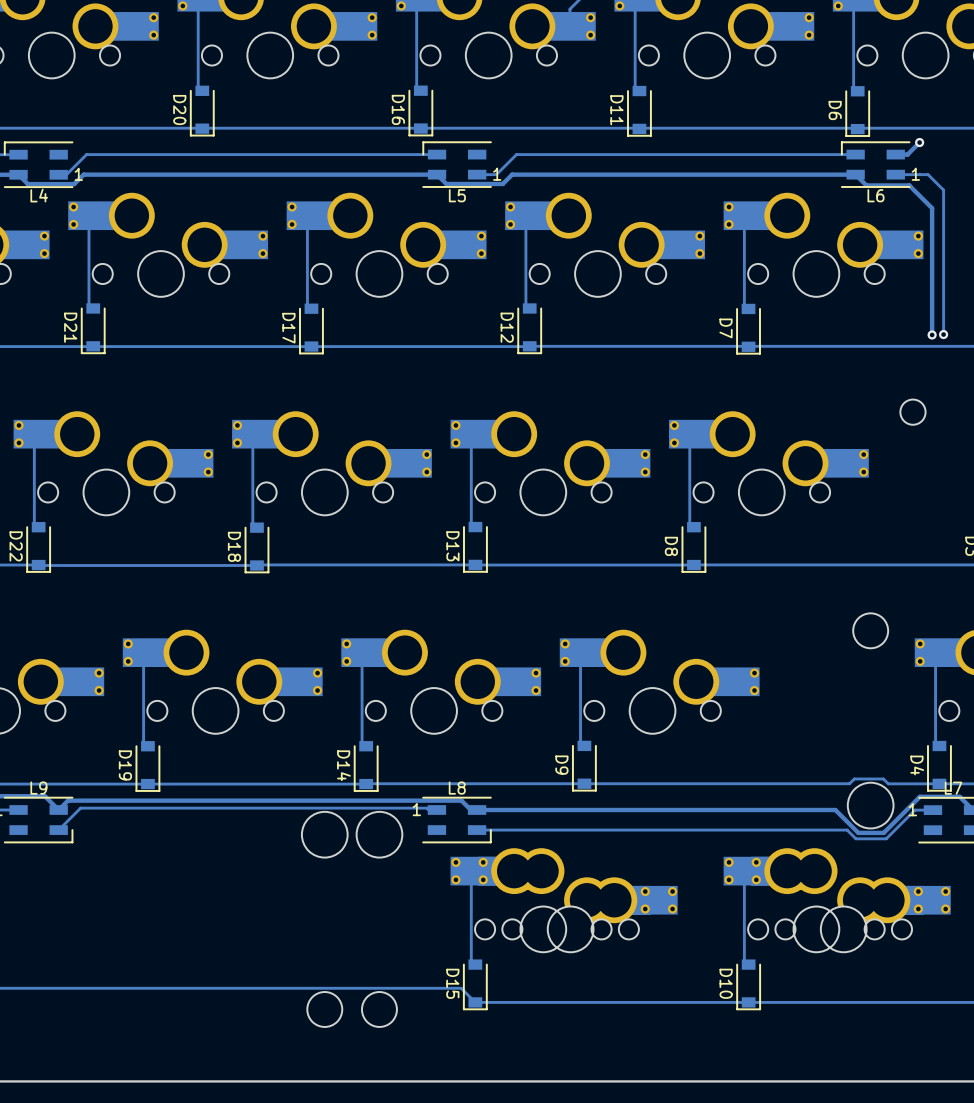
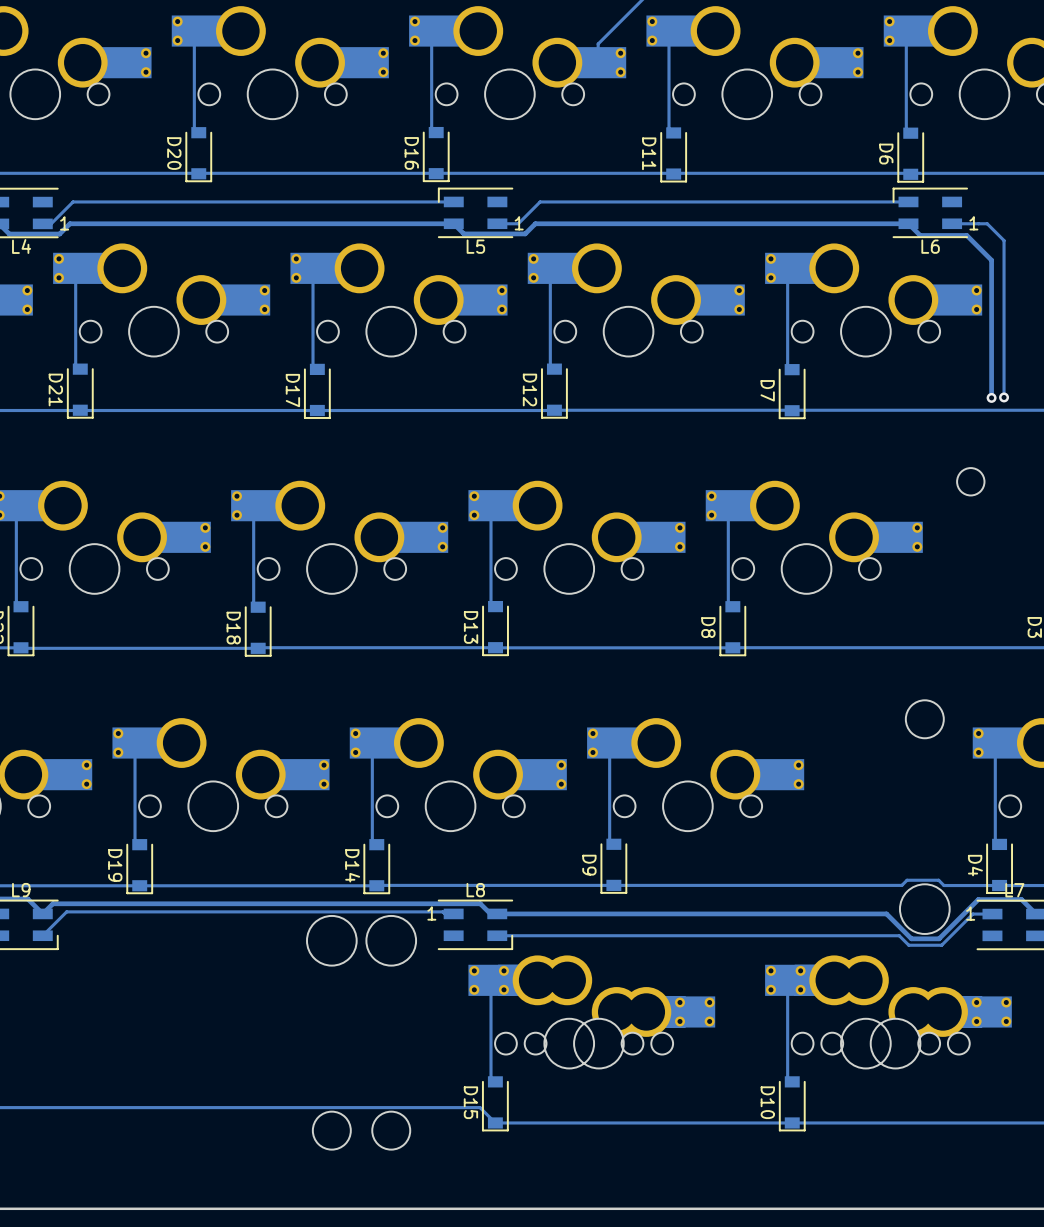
track: (919, 142) (907, 154) (895, 154) -> none
via: (919, 142) -> none

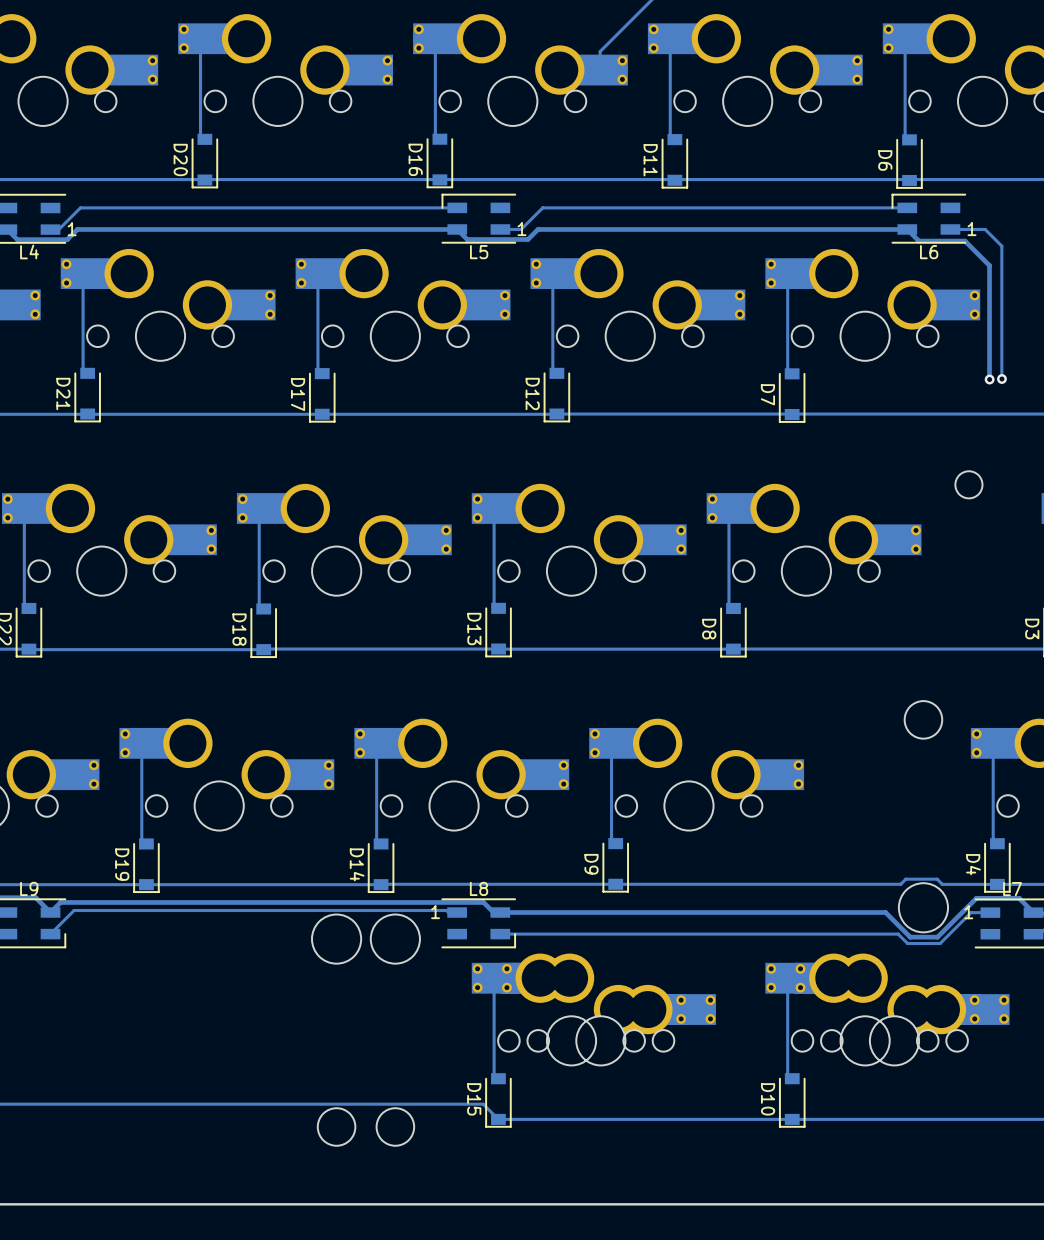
track: (1004, 374) (1004, 397) -> none
via: none -> (1001, 379)
track: (991, 375) (991, 397) -> none
via: none -> (989, 379)
via: (991, 397) -> none
via: (1004, 397) -> none

